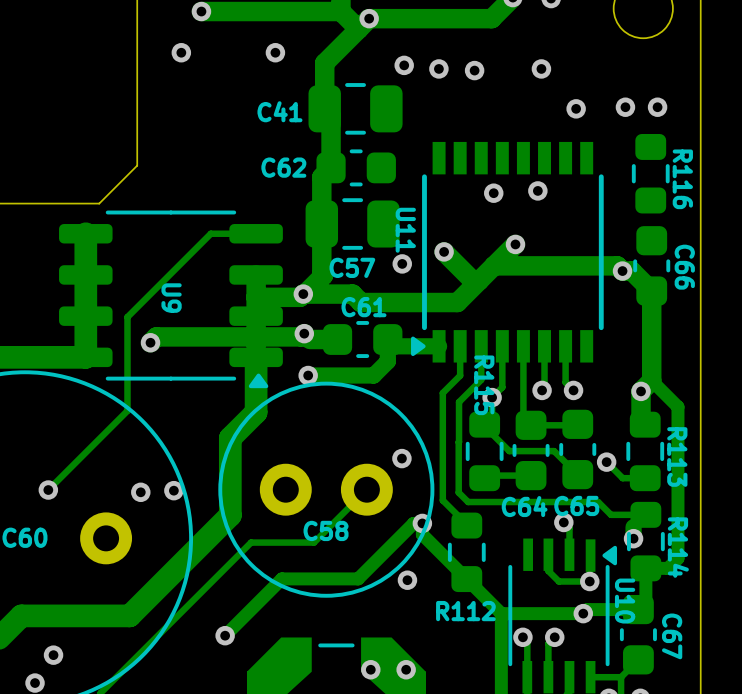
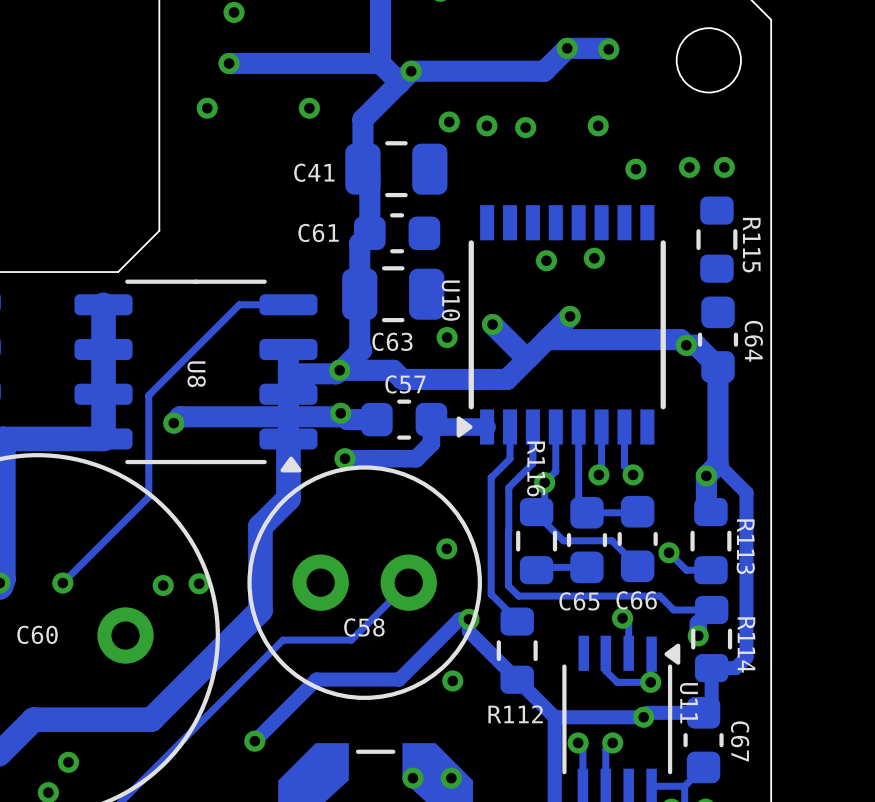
C62 name: C62 (283, 167) -> C61 (318, 232)
R116 name: R116 (682, 179) -> R115 (751, 245)
U11 name: U11 (405, 230) -> U10 (450, 300)
C57 name: C57 (352, 267) -> C63 (392, 341)
C66 name: C66 (684, 267) -> C64 (753, 341)
U9 name: U9 (171, 298) -> U8 (196, 374)
C61 name: C61 (363, 307) -> C57 (405, 384)
R115 name: R115 (484, 385) -> R116 (536, 468)
C65 name: C65 (576, 505) -> C66 (636, 600)
C64 name: C64 (524, 506) -> C65 (579, 601)
U10 name: U10 (625, 601) -> U11 (688, 703)

